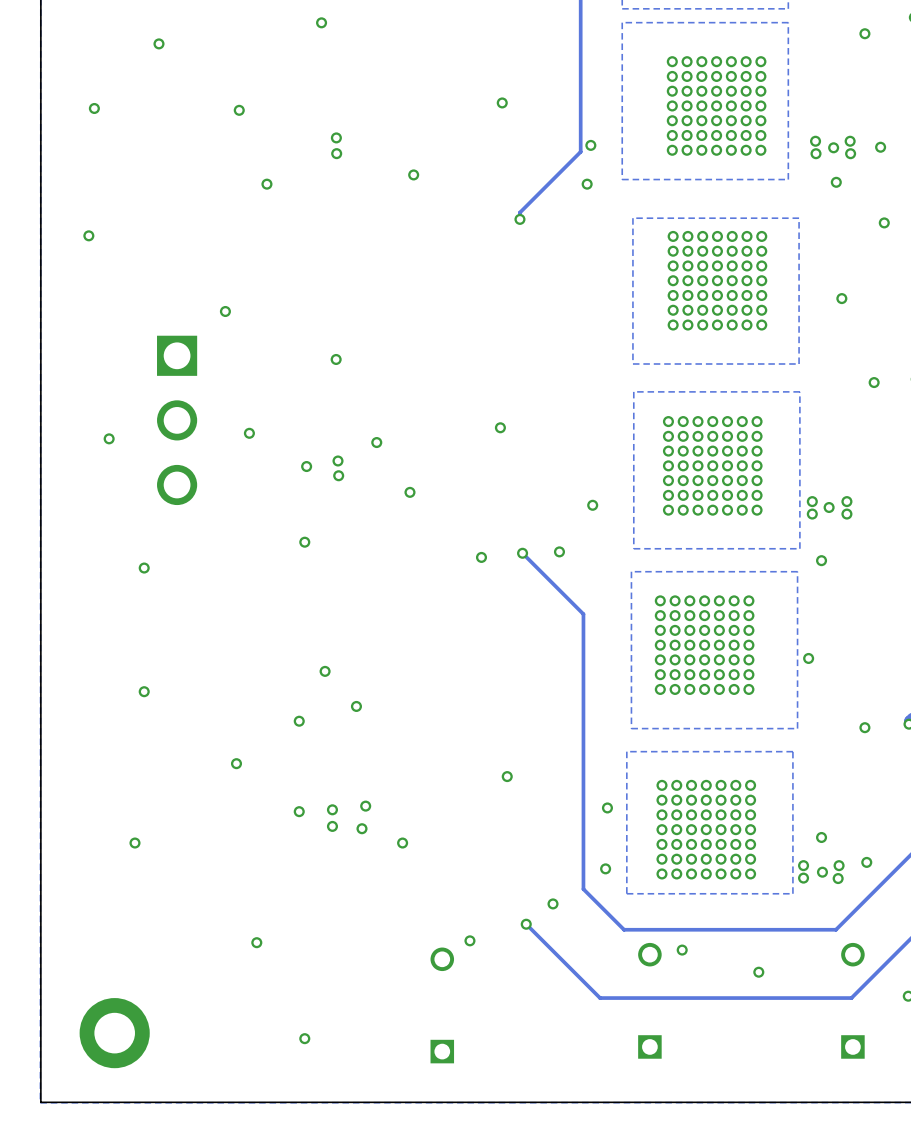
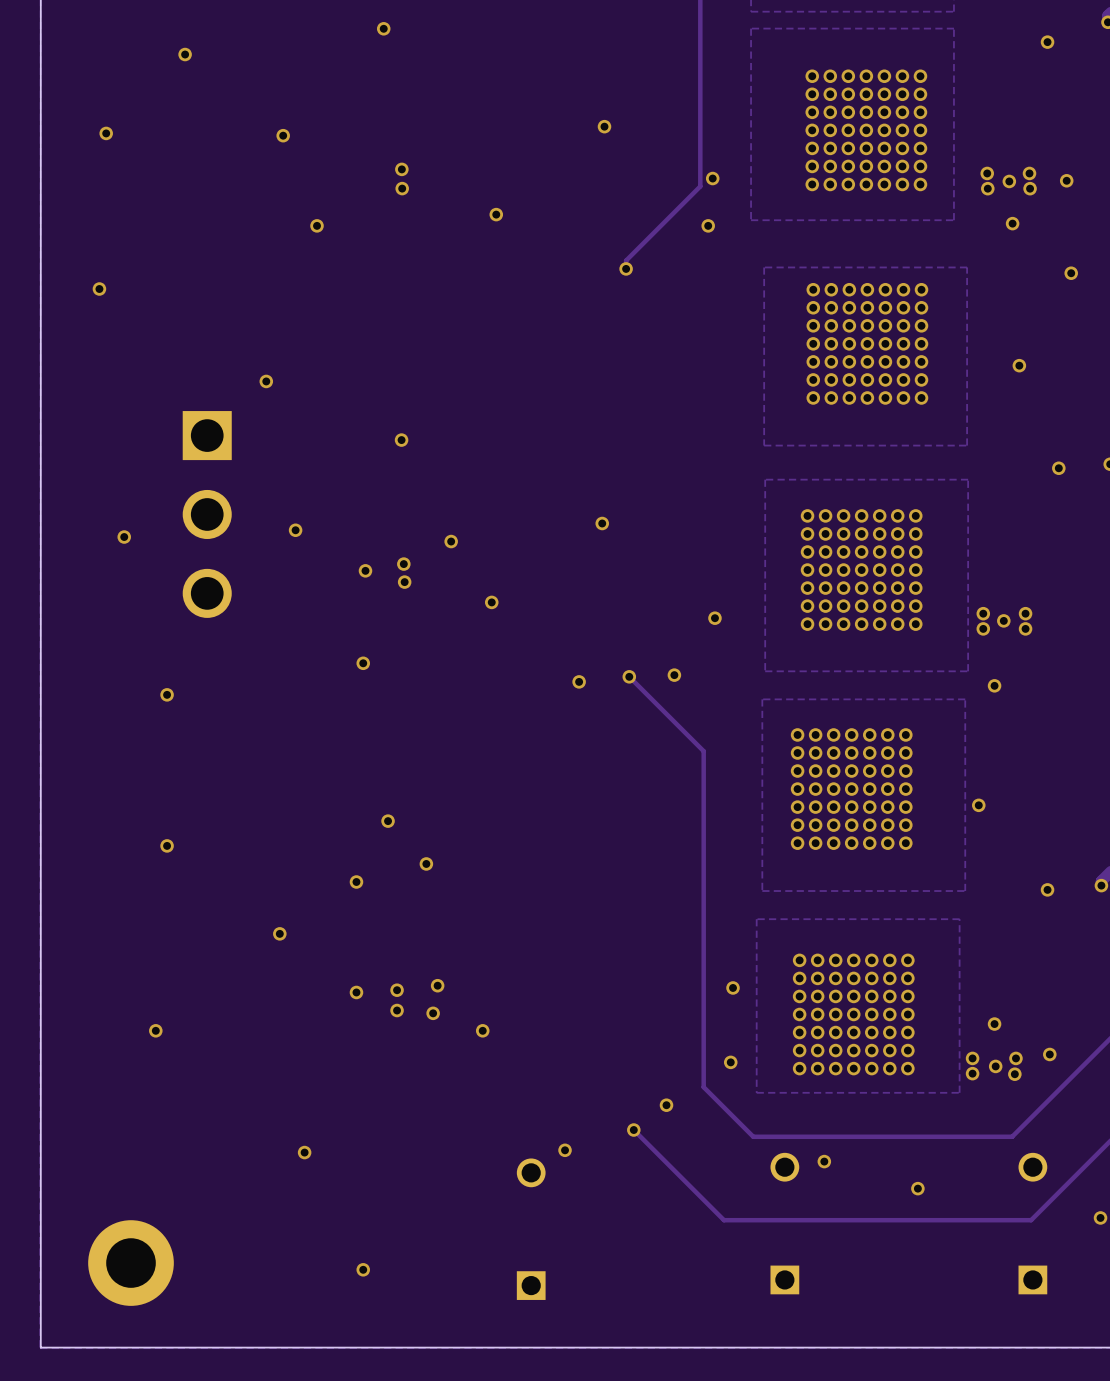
via: (507, 776) -> none

